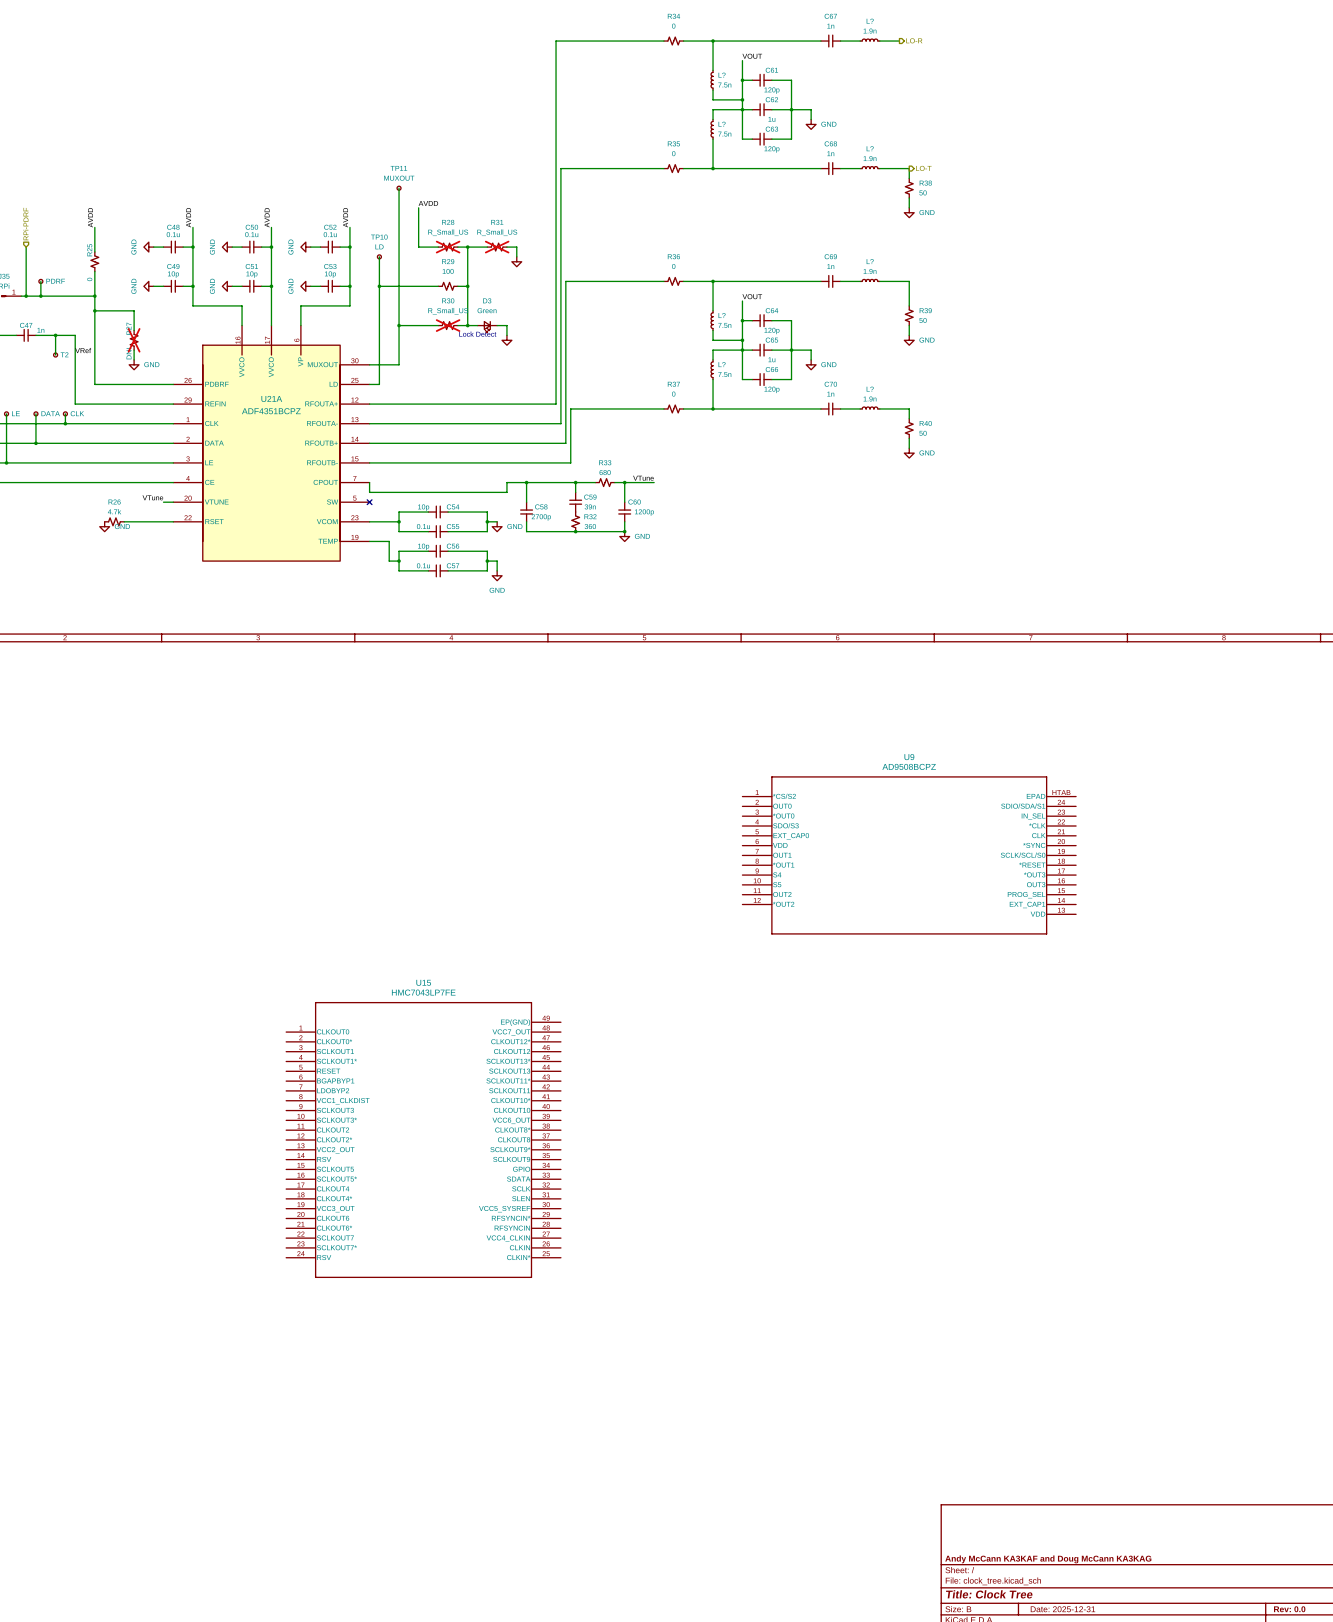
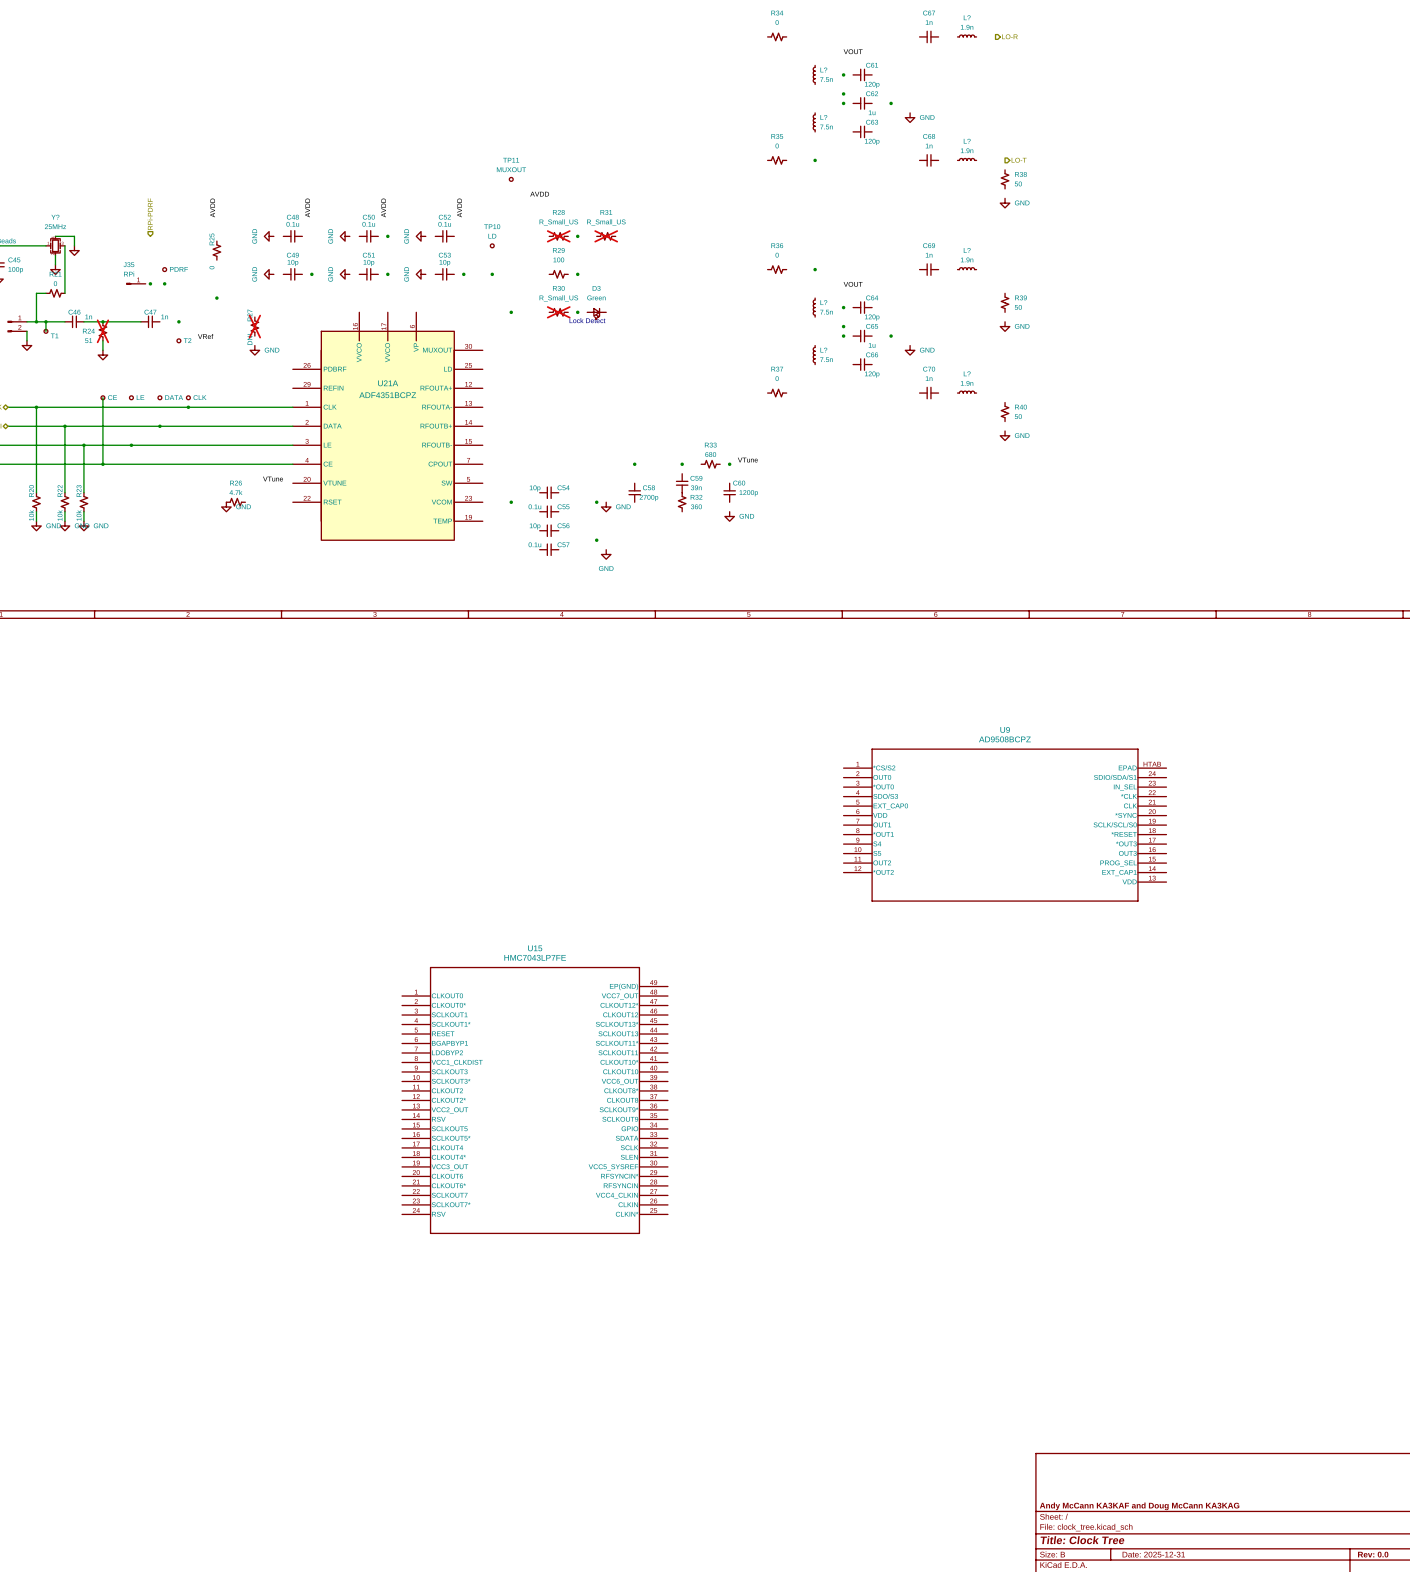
wire: (663, 41) (556, 41) (556, 404) (369, 404) -> none
wire: (683, 41) (820, 41) -> none
wire: (713, 41) (713, 70) -> none
junction: (713, 41) -> none
wire: (840, 41) (860, 41) -> none
wire: (879, 41) (899, 41) -> none
wire: (742, 60) (742, 139) (752, 139) -> none
wire: (742, 80) (752, 80) -> none
wire: (771, 80) (791, 80) (791, 139) (771, 139) -> none
wire: (713, 90) (713, 99) (742, 99) -> none
wire: (752, 109) (713, 109) (713, 119) -> none
wire: (771, 109) (811, 109) (811, 119) -> none
wire: (713, 139) (713, 168) -> none
wire: (663, 168) (560, 168) (560, 423) (369, 423) -> none
wire: (683, 168) (820, 168) -> none
wire: (840, 168) (860, 168) -> none
wire: (879, 168) (909, 168) (909, 178) -> none
wire: (399, 188) (399, 364) (369, 364) -> none
wire: (909, 198) (909, 207) -> none
wire: (418, 207) (418, 247) (438, 247) -> none
wire: (94, 227) (94, 251) -> none
wire: (192, 227) (192, 305) (242, 305) (242, 325) -> none
wire: (271, 227) (271, 325) -> none
wire: (349, 227) (349, 305) (300, 305) (300, 325) -> none
wire: (26, 247) (26, 296) -> none
wire: (153, 247) (163, 247) -> none
wire: (183, 247) (192, 247) -> none
junction: (192, 247) -> none
wire: (232, 247) (242, 247) -> none
wire: (261, 247) (271, 247) -> none
wire: (310, 247) (320, 247) -> none
wire: (340, 247) (349, 247) -> none
junction: (349, 247) -> none
wire: (457, 247) (487, 247) -> none
wire: (467, 247) (467, 325) -> none
wire: (506, 247) (516, 247) (516, 256) -> none
wire: (379, 256) (379, 384) (369, 384) -> none
power symbol: (516, 261) -> none
wire: (94, 271) (94, 384) (173, 384) -> none
wire: (40, 281) (40, 296) -> none
wire: (663, 281) (565, 281) (565, 443) (369, 443) -> none
wire: (683, 281) (820, 281) -> none
wire: (713, 281) (713, 310) -> none
wire: (840, 281) (860, 281) -> none
wire: (879, 281) (909, 281) (909, 305) -> none
wire: (153, 286) (163, 286) -> none
wire: (183, 286) (192, 286) -> none
wire: (232, 286) (242, 286) -> none
wire: (261, 286) (271, 286) -> none
wire: (310, 286) (320, 286) -> none
wire: (340, 286) (349, 286) -> none
wire: (379, 286) (438, 286) -> none
wire: (457, 286) (467, 286) -> none
wire: (21, 296) (94, 296) -> none
junction: (94, 296) -> none
wire: (742, 301) (742, 379) (752, 379) -> none
wire: (94, 310) (134, 310) (134, 330) -> none
wire: (742, 320) (752, 320) -> none
wire: (771, 320) (791, 320) (791, 379) (771, 379) -> none
wire: (399, 325) (438, 325) -> none
wire: (457, 325) (477, 325) -> none
wire: (497, 325) (506, 325) (506, 335) -> none
wire: (909, 325) (909, 335) -> none
wire: (713, 330) (713, 340) (742, 340) -> none
wire: (35, 335) (75, 335) (75, 404) (173, 404) -> none
wire: (55, 335) (55, 355) -> none
power symbol: (506, 340) -> none
wire: (134, 350) (134, 359) -> none
wire: (752, 350) (713, 350) (713, 359) -> none
wire: (771, 350) (811, 350) (811, 359) -> none
wire: (713, 379) (713, 408) -> none
wire: (663, 408) (570, 408) (570, 462) (369, 462) -> none
wire: (683, 408) (820, 408) -> none
junction: (713, 408) -> none
wire: (840, 408) (860, 408) -> none
wire: (879, 408) (909, 408) (909, 418) -> none
wire: (6, 413) (6, 462) -> none
wire: (35, 413) (35, 443) -> none
wire: (65, 413) (65, 423) -> none
wire: (909, 438) (909, 448) -> none
wire: (369, 482) (369, 492) (506, 492) (506, 482) (595, 482) -> none
wire: (526, 482) (526, 502) -> none
wire: (575, 482) (575, 492) -> none
wire: (614, 482) (654, 482) -> none
wire: (624, 482) (624, 502) -> none
wire: (163, 502) (173, 502) -> none
no-connect mark: (369, 502) -> none
wire: (428, 512) (399, 512) (399, 531) (428, 531) -> none
wire: (448, 512) (487, 512) (487, 531) (448, 531) -> none
wire: (124, 521) (173, 521) -> none
wire: (369, 521) (399, 521) -> none
wire: (487, 521) (497, 521) -> none
wire: (526, 521) (526, 531) (624, 531) (624, 521) -> none
junction: (575, 531) -> none
junction: (624, 531) -> none
wire: (369, 541) (389, 541) (389, 561) (399, 561) -> none
wire: (428, 551) (399, 551) (399, 570) (428, 570) -> none
wire: (448, 551) (487, 551) (487, 570) (448, 570) -> none
junction: (399, 561) -> none
wire: (487, 561) (497, 561) (497, 570) -> none

